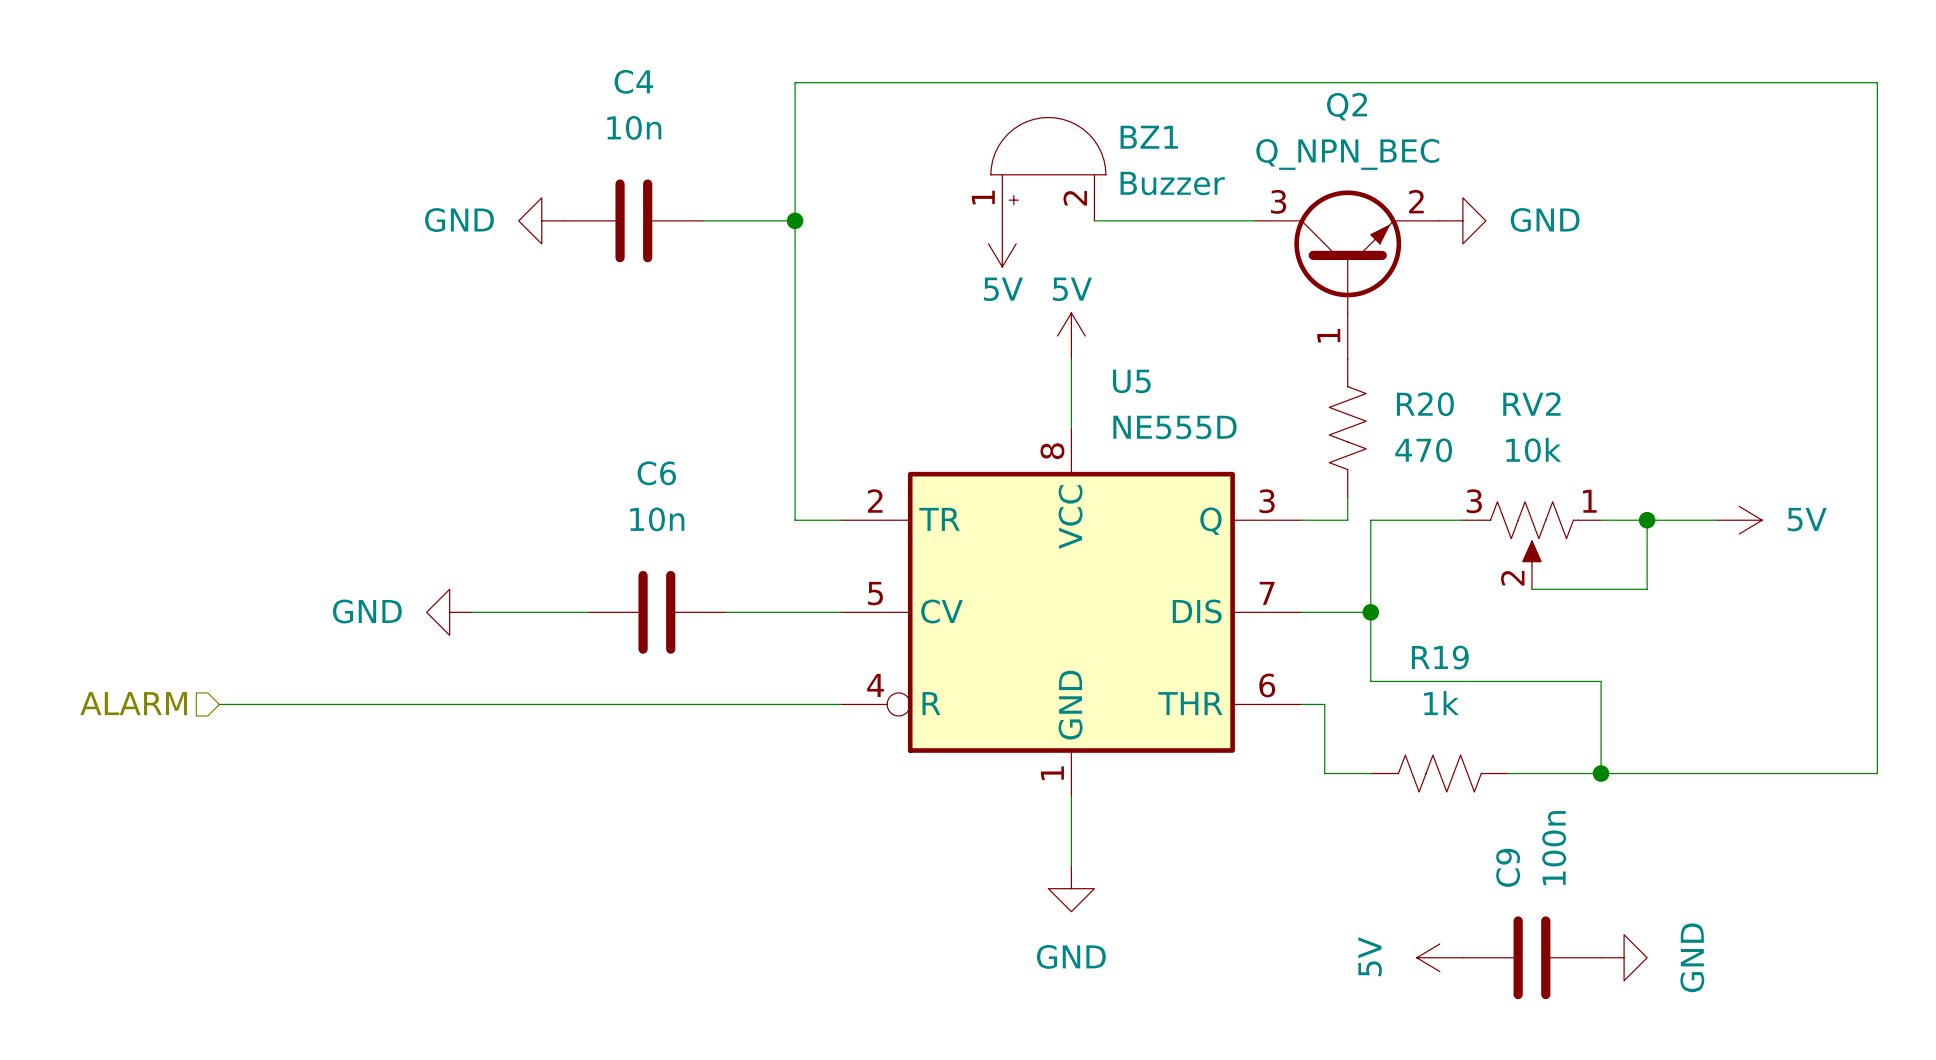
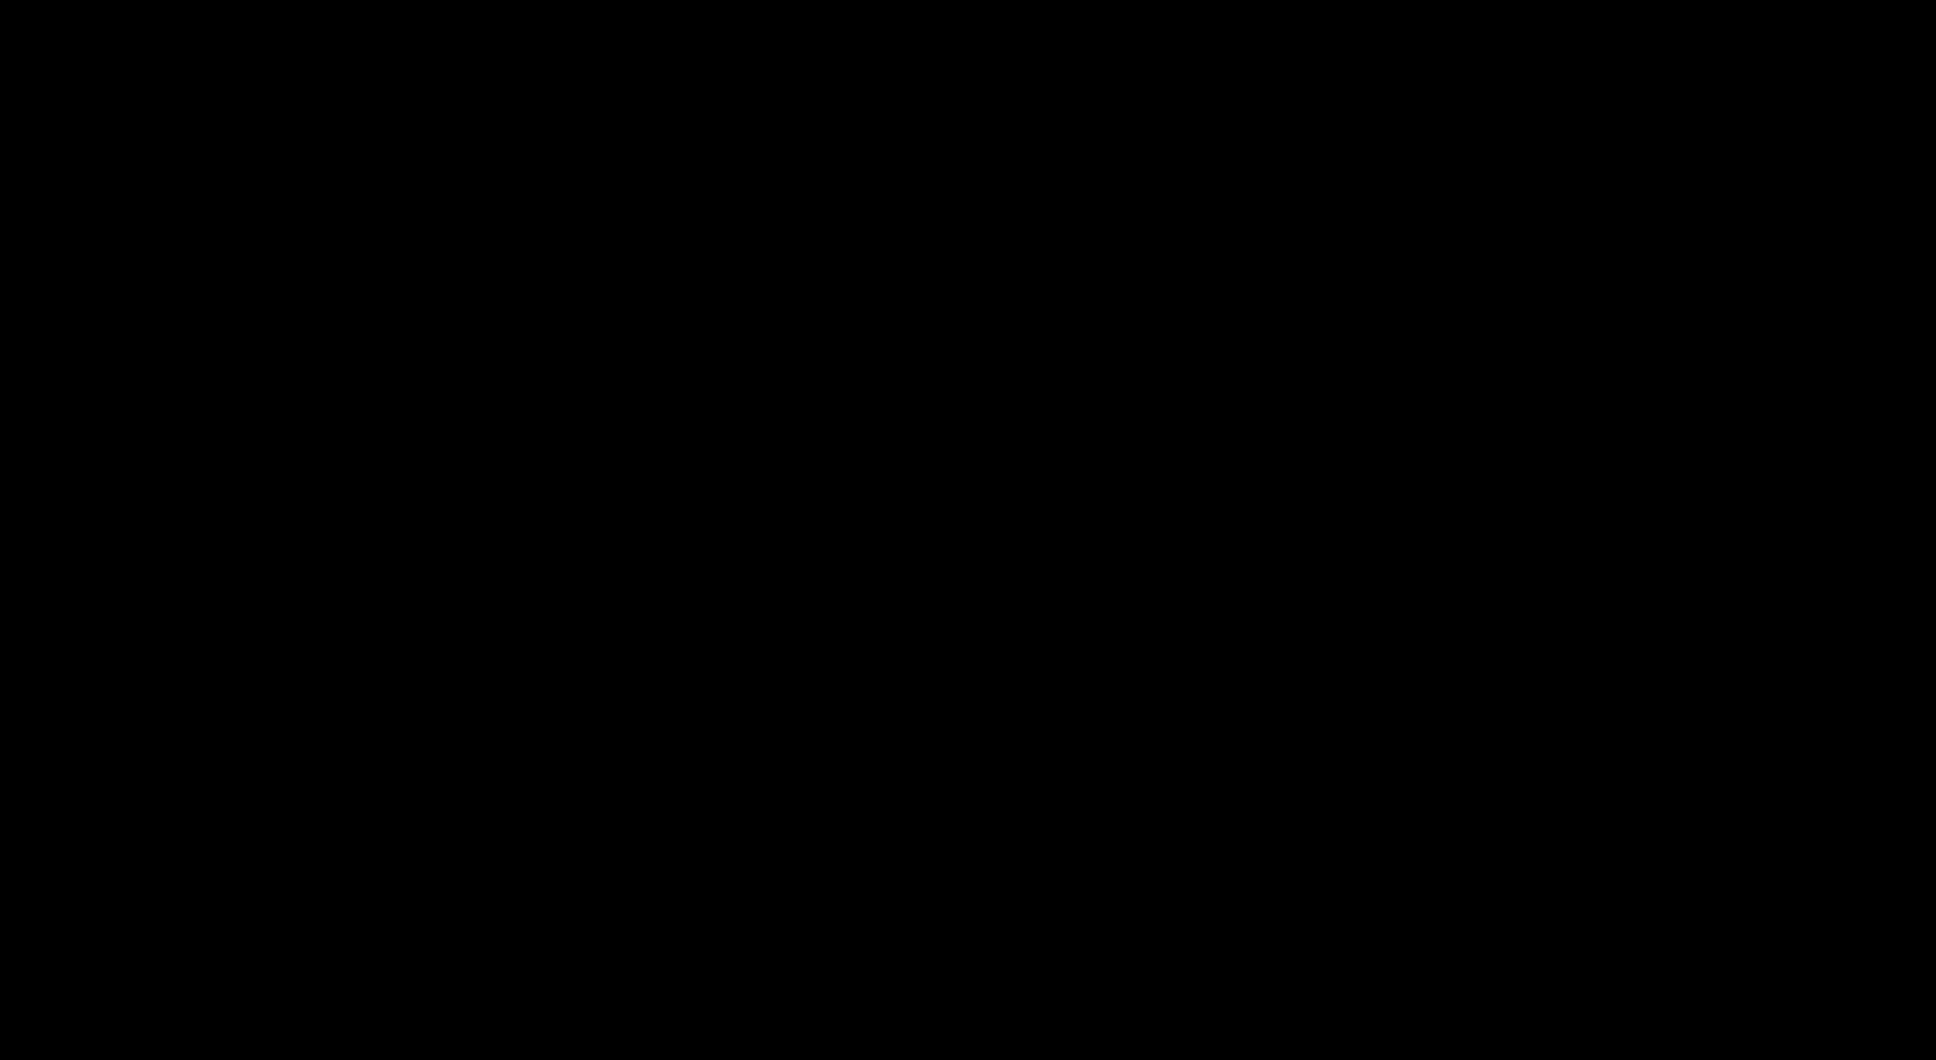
BZ1: Buzzer (1048, 169) -> none
power symbol: GND (541, 220) -> none
C4: 10n (633, 220) -> none
wire: (702, 220) (795, 220) -> none
junction: (795, 220) -> none
wire: (1094, 220) (1255, 220) -> none
power symbol: GND (1462, 220) -> none
power symbol: 5V (1002, 243) -> none
Q2: Q_NPN_BEC (1347, 274) -> none
power symbol: 5V (1071, 336) -> none
wire: (1071, 359) (1071, 428) -> none
R20: 470 (1347, 428) -> none
wire: (1347, 497) (1347, 520) (1301, 520) -> none
wire: (841, 520) (795, 520) (795, 82) (1877, 82) (1877, 773) (1508, 773) -> none
wire: (1462, 520) (1370, 520) (1370, 681) (1601, 681) (1601, 773) -> none
wire: (1601, 520) (1716, 520) -> none
wire: (1647, 520) (1647, 589) (1531, 589) -> none
junction: (1647, 520) -> none
power symbol: 5V (1739, 520) -> none
RV2: 10k (1531, 545) -> none
power symbol: GND (449, 612) -> none
wire: (472, 612) (587, 612) -> none
C6: 10n (656, 612) -> none
wire: (725, 612) (841, 612) -> none
U5: NE555D (1071, 612) -> none
wire: (1301, 612) (1370, 612) -> none
junction: (1370, 612) -> none
hierarchical label: ALARM (133, 703) -> none
wire: (219, 704) (841, 704) -> none
wire: (1301, 704) (1324, 704) (1324, 773) (1370, 773) -> none
R19: 1k (1439, 773) -> none
junction: (1601, 773) -> none
wire: (1071, 796) (1071, 865) -> none
power symbol: GND (1071, 888) -> none
power symbol: 5V (1439, 957) -> none
C9: 100n (1531, 957) -> none
power symbol: GND (1624, 957) -> none

